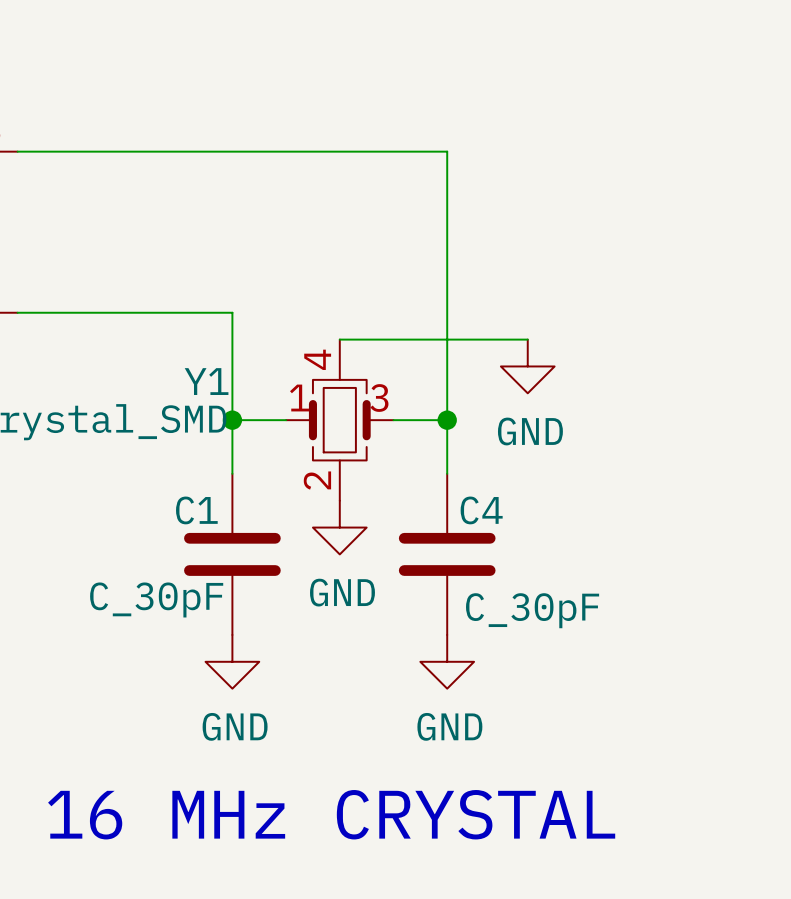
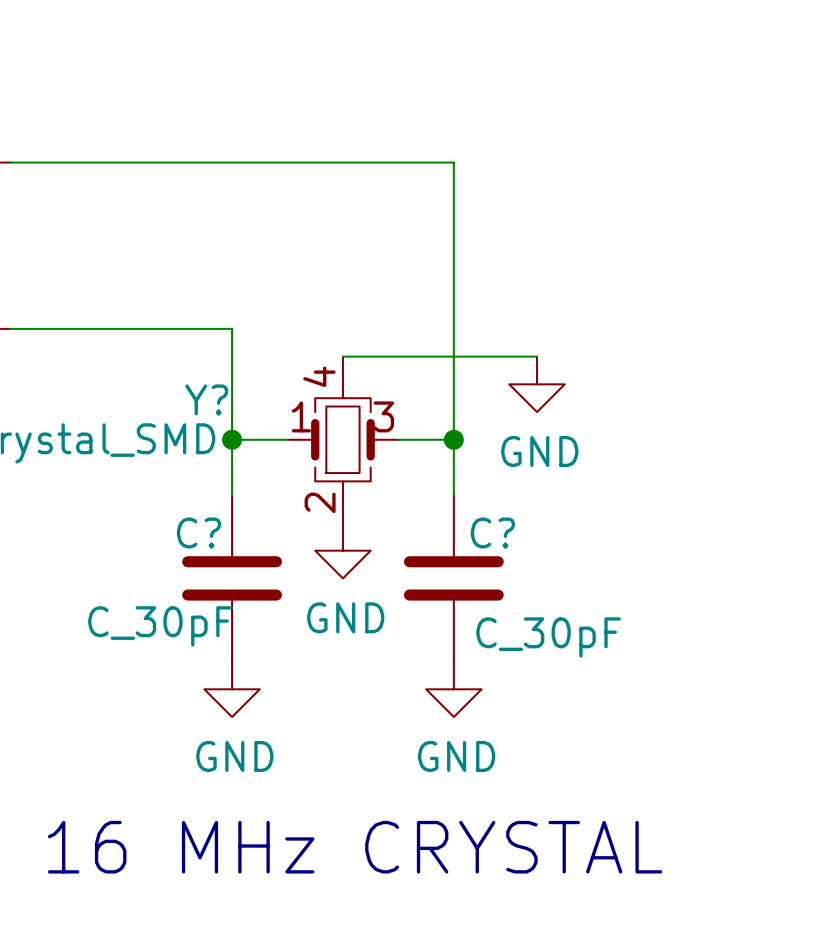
Y1 name: Y1 (206, 381) -> Y? (206, 399)
C1 name: C1 (196, 510) -> C? (199, 533)
C4 name: C4 (481, 510) -> C? (492, 533)

